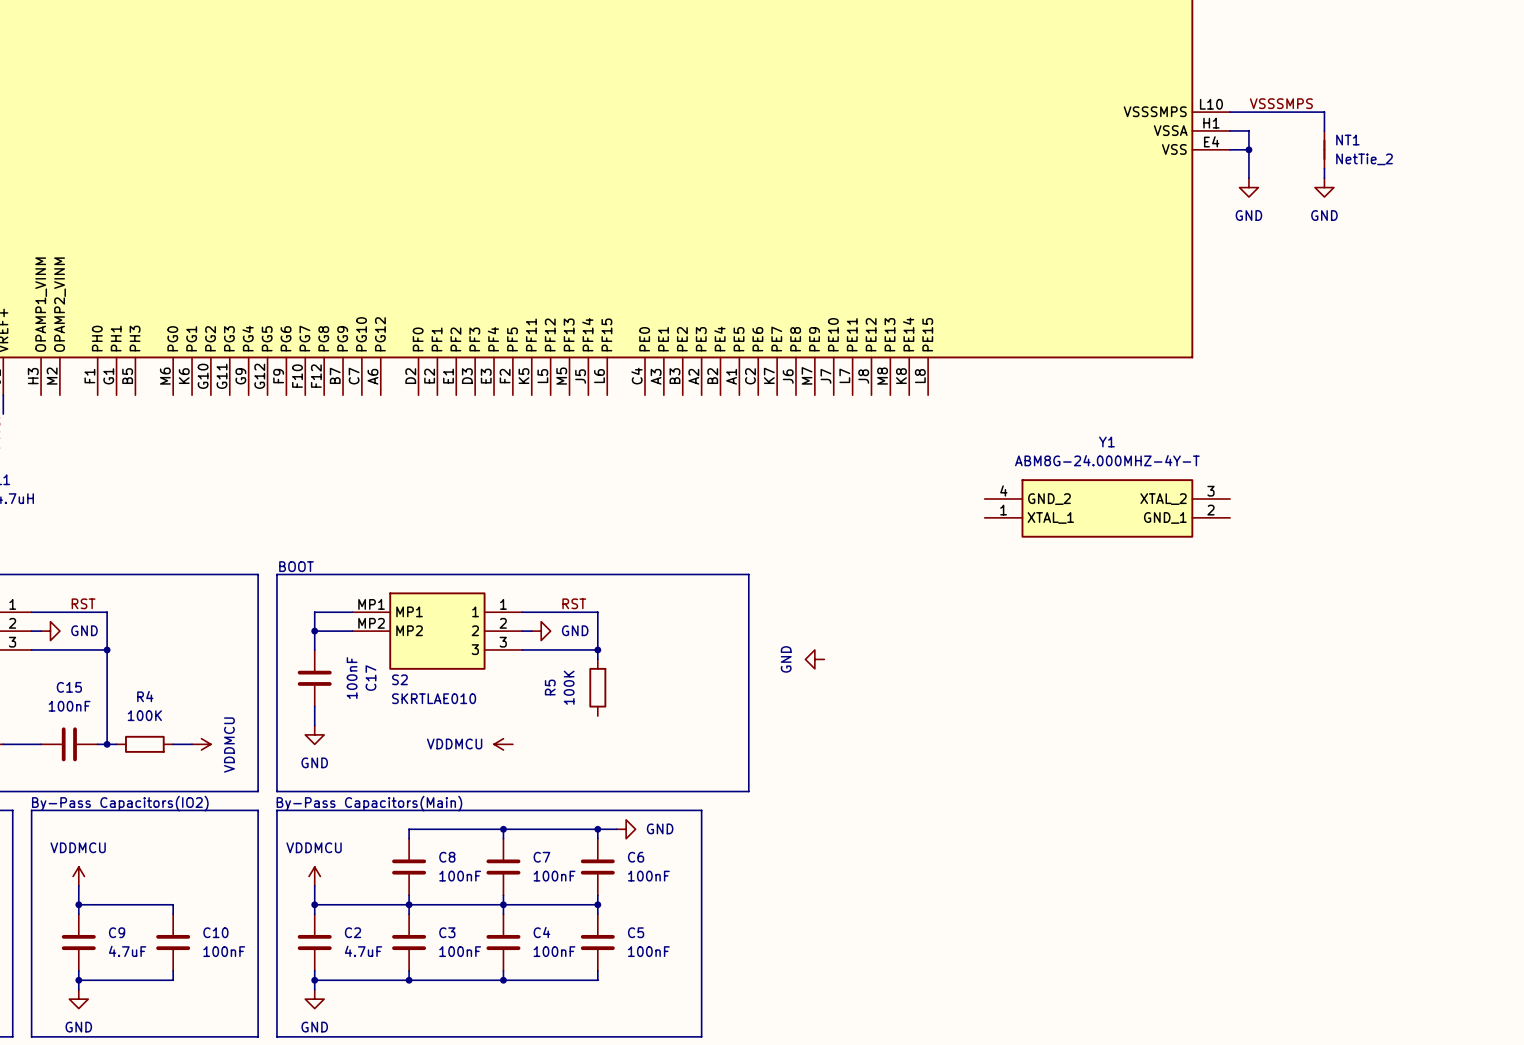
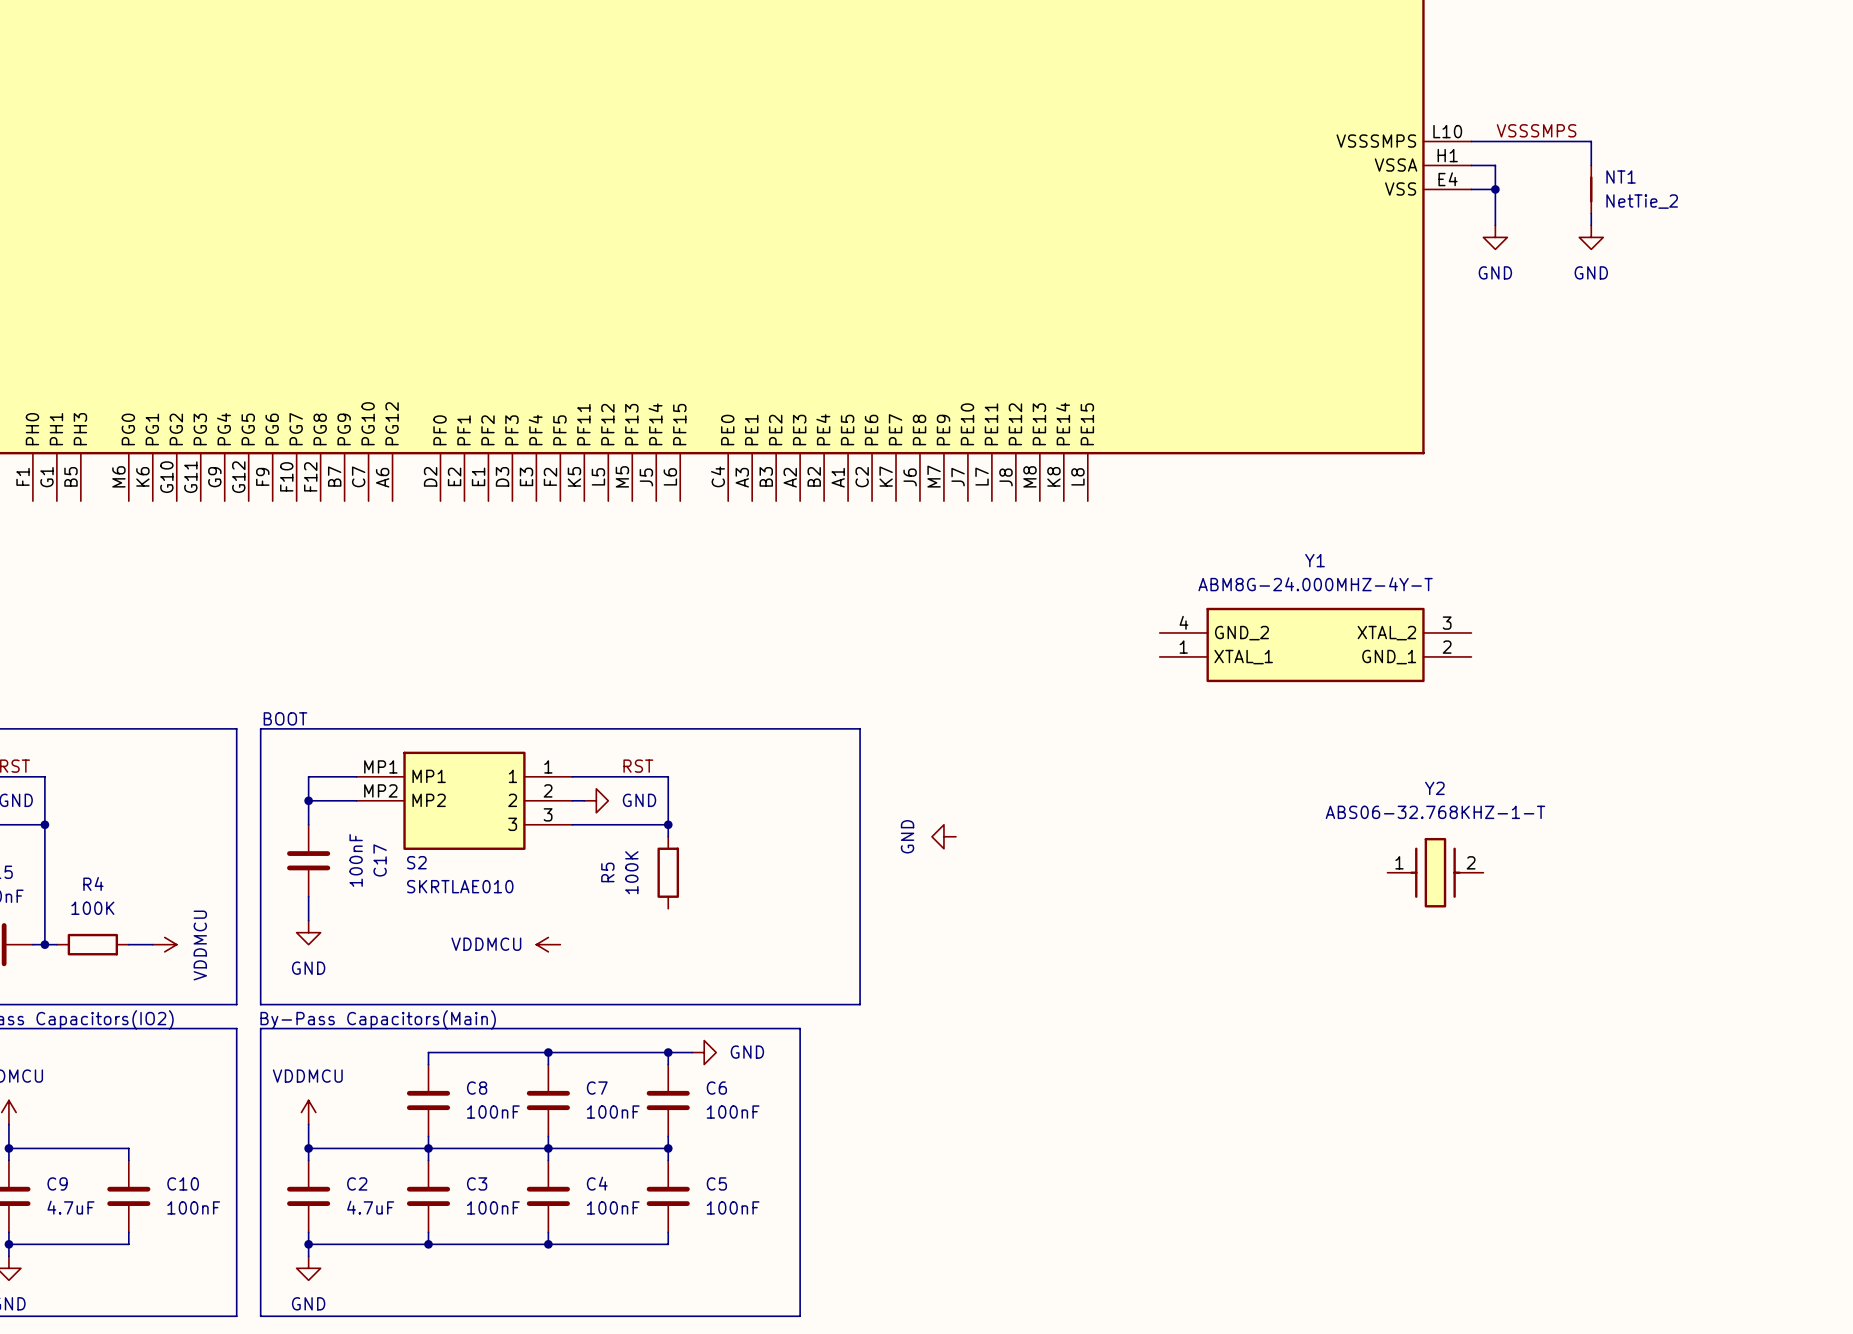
Y2: none -> ABS06-32.768KHZ-1-T (1435, 872)

